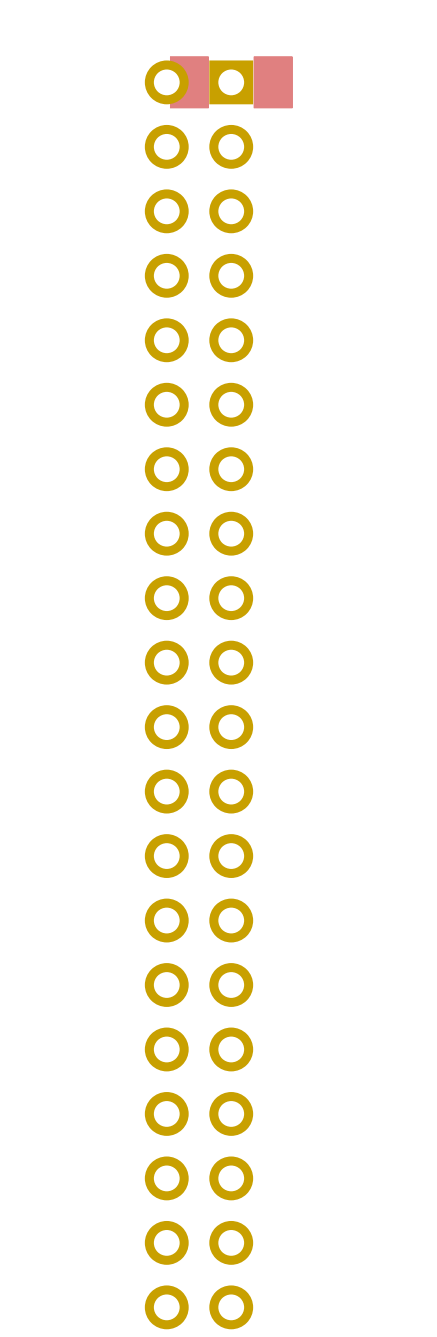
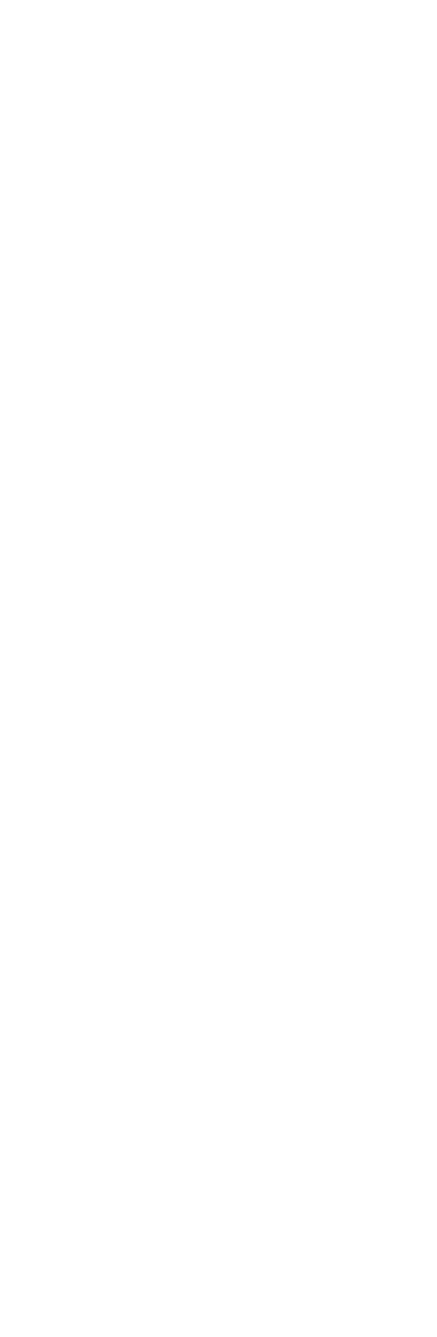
part: (231, 82) -> none
part: (199, 694) -> none

